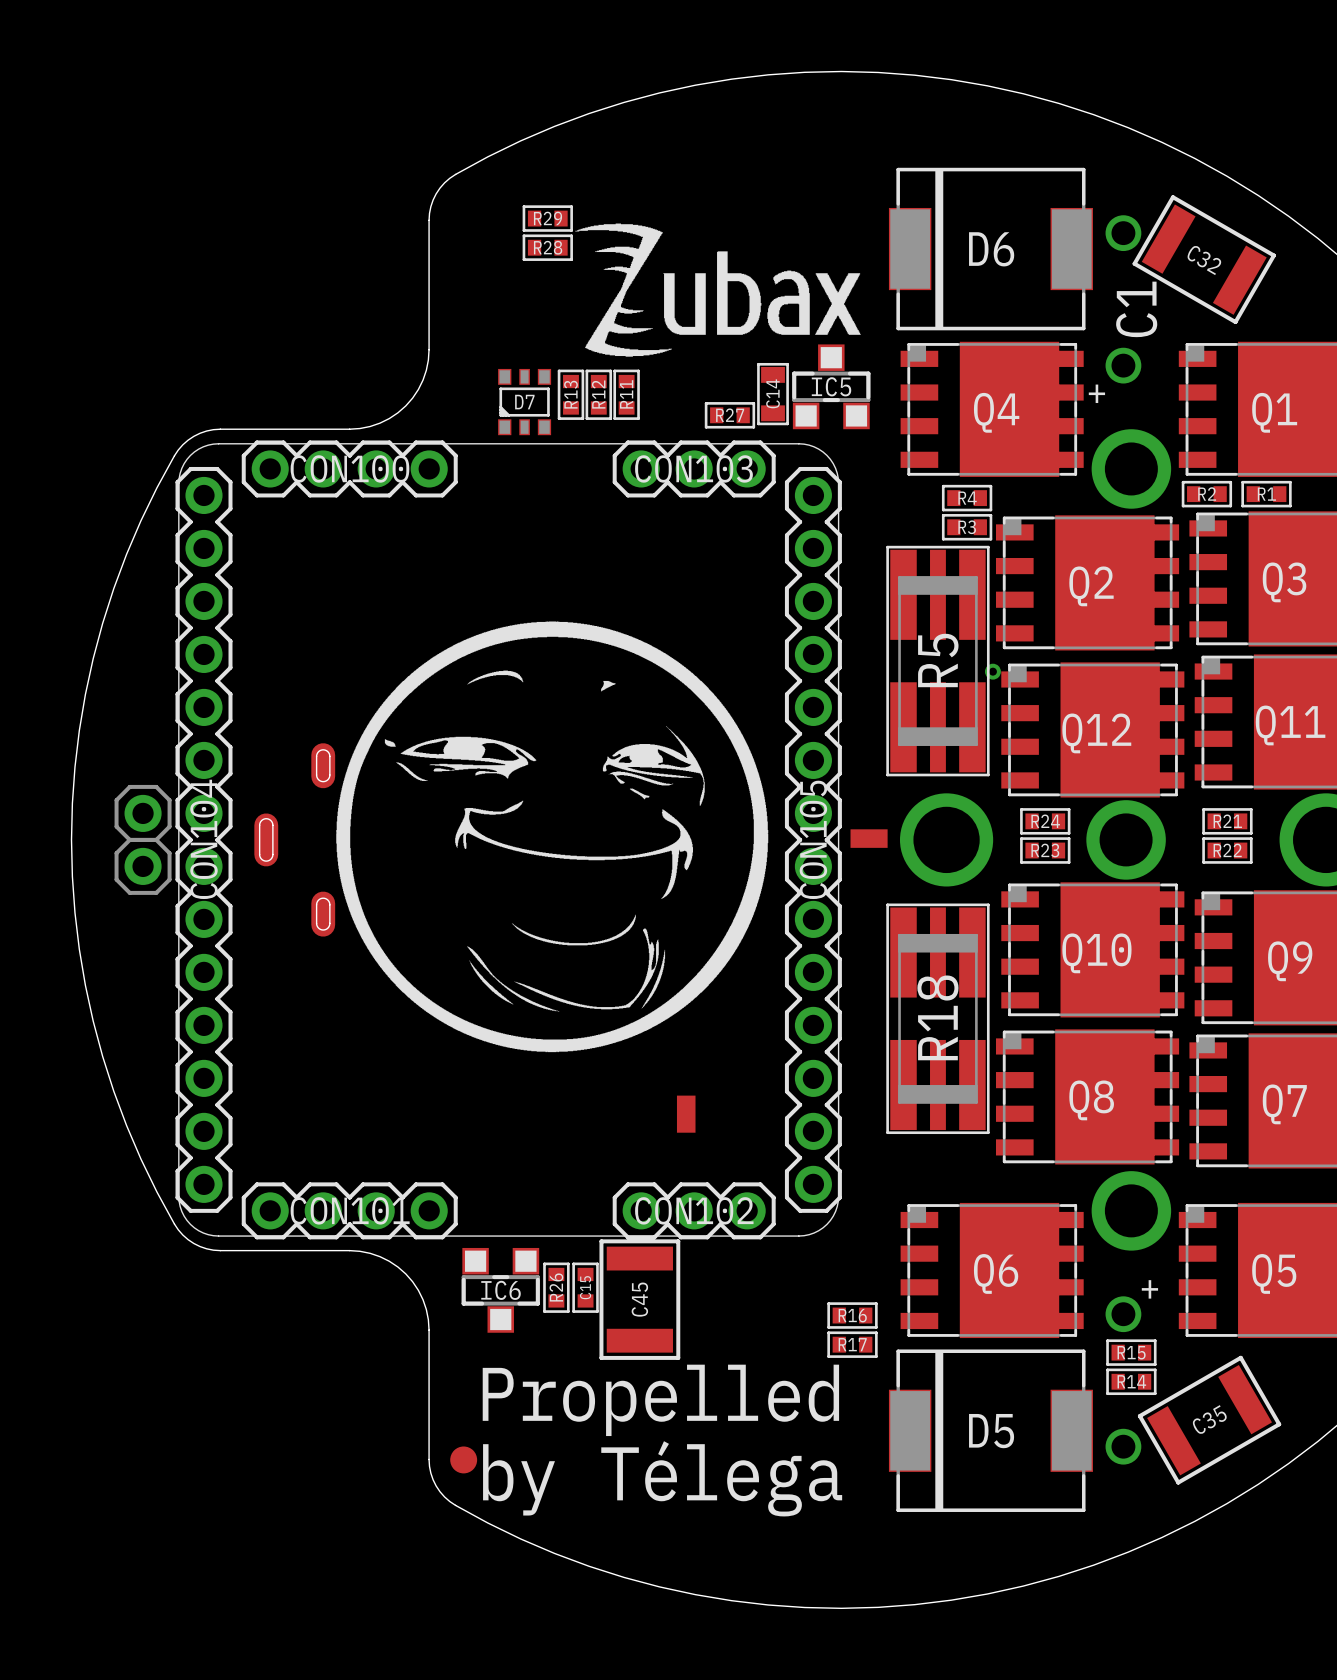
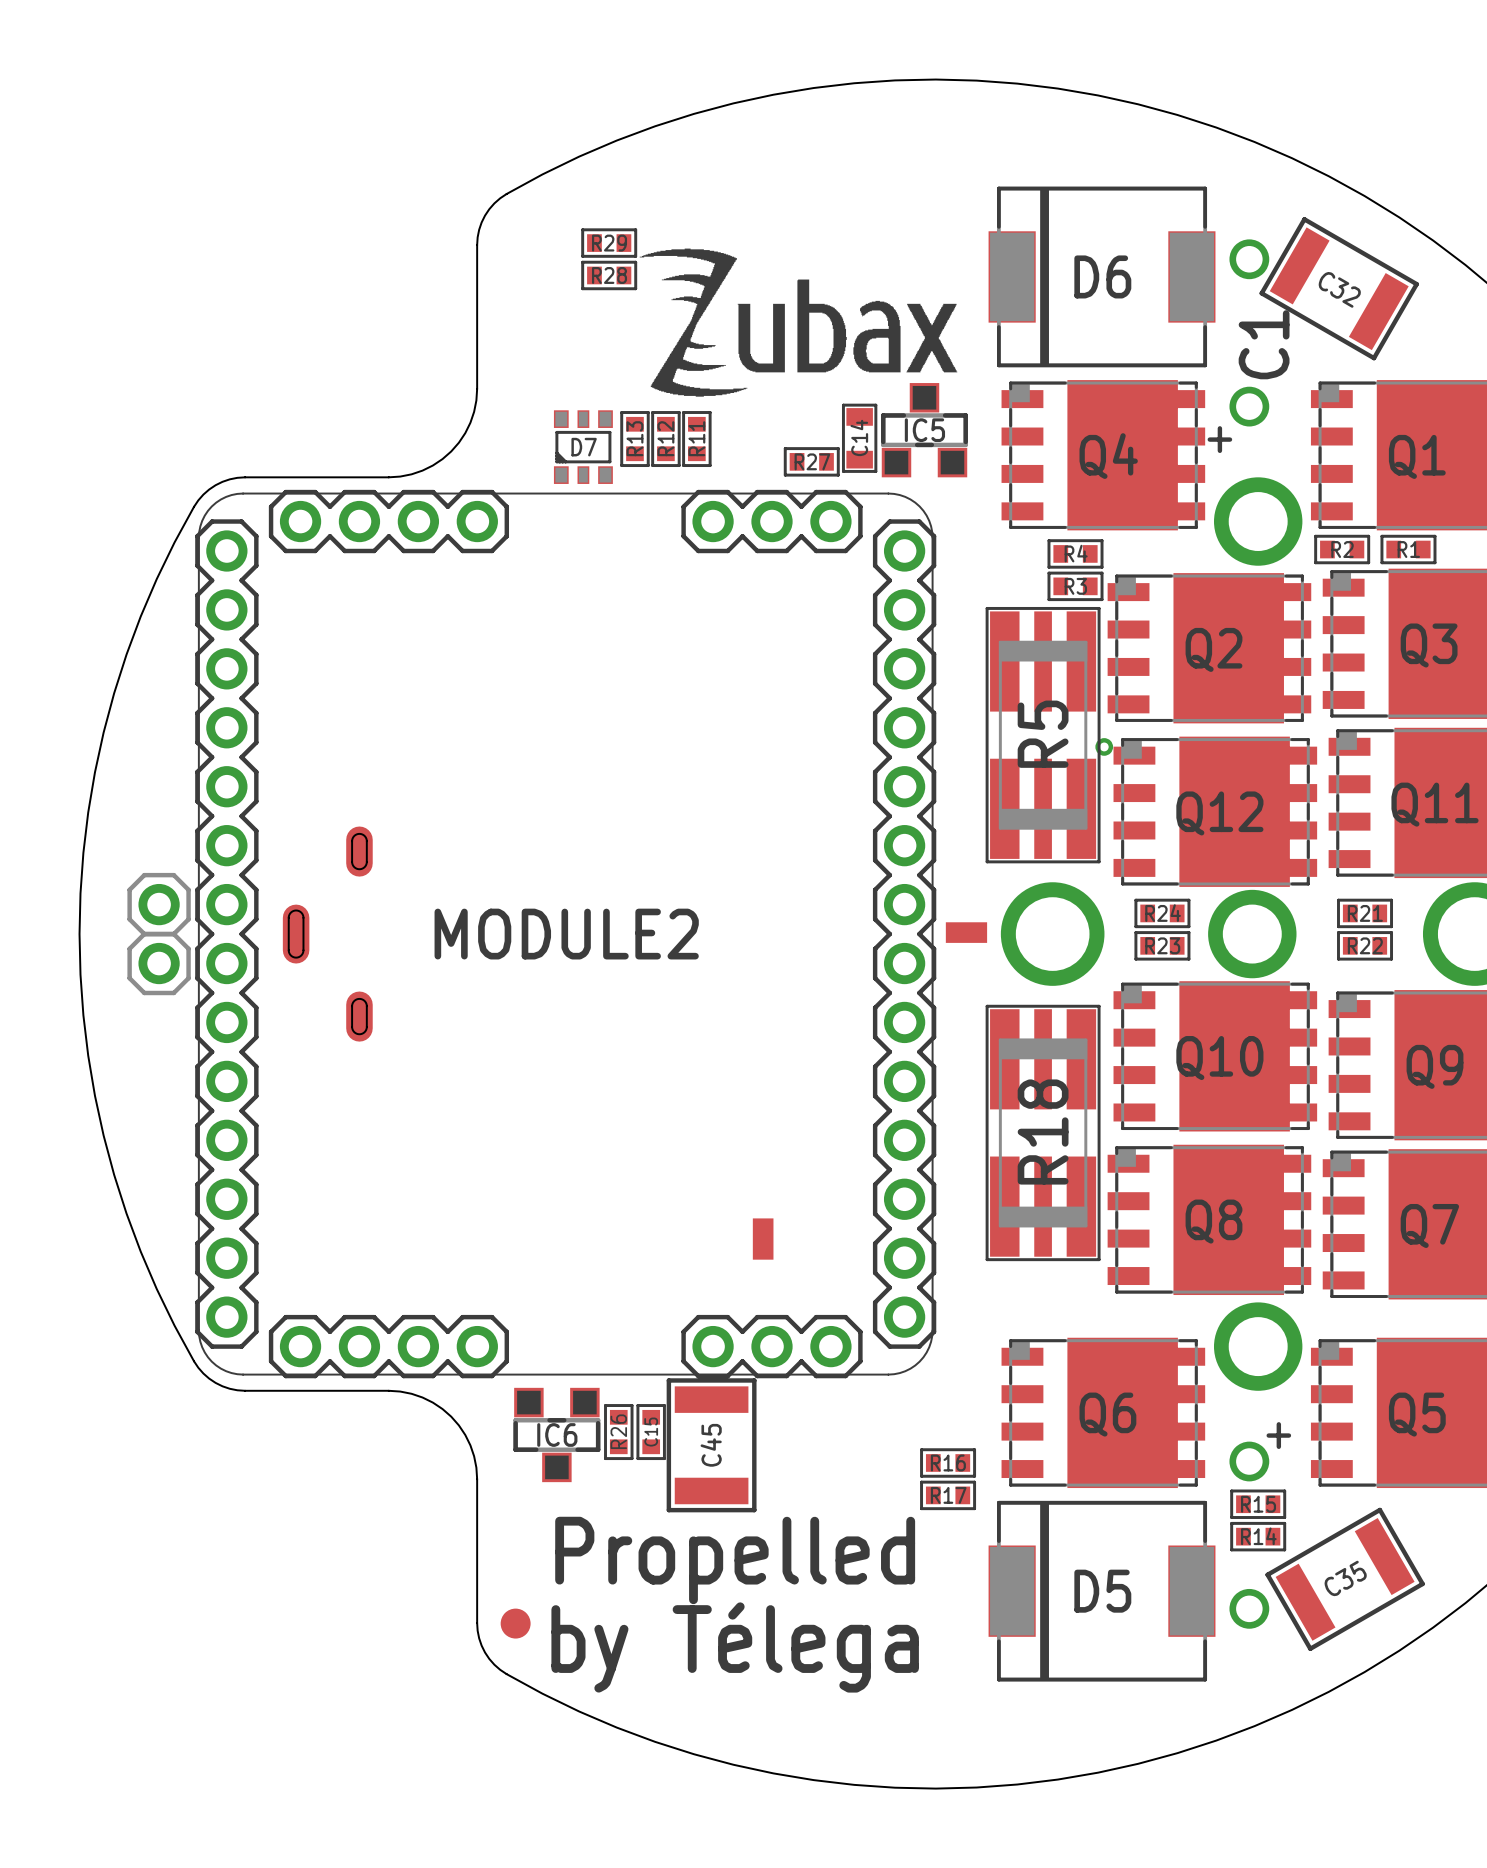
text: CON100 (349, 468) -> none
text: CON103 (693, 468) -> none
drawing: [336, 621, 769, 1053] -> none
text: CON104 (203, 839) -> none
MODULE2 name: none -> MODULE2 (566, 934)
text: CON105 (813, 839) -> none
text: CON101 (350, 1210) -> none
text: CON102 (694, 1210) -> none

